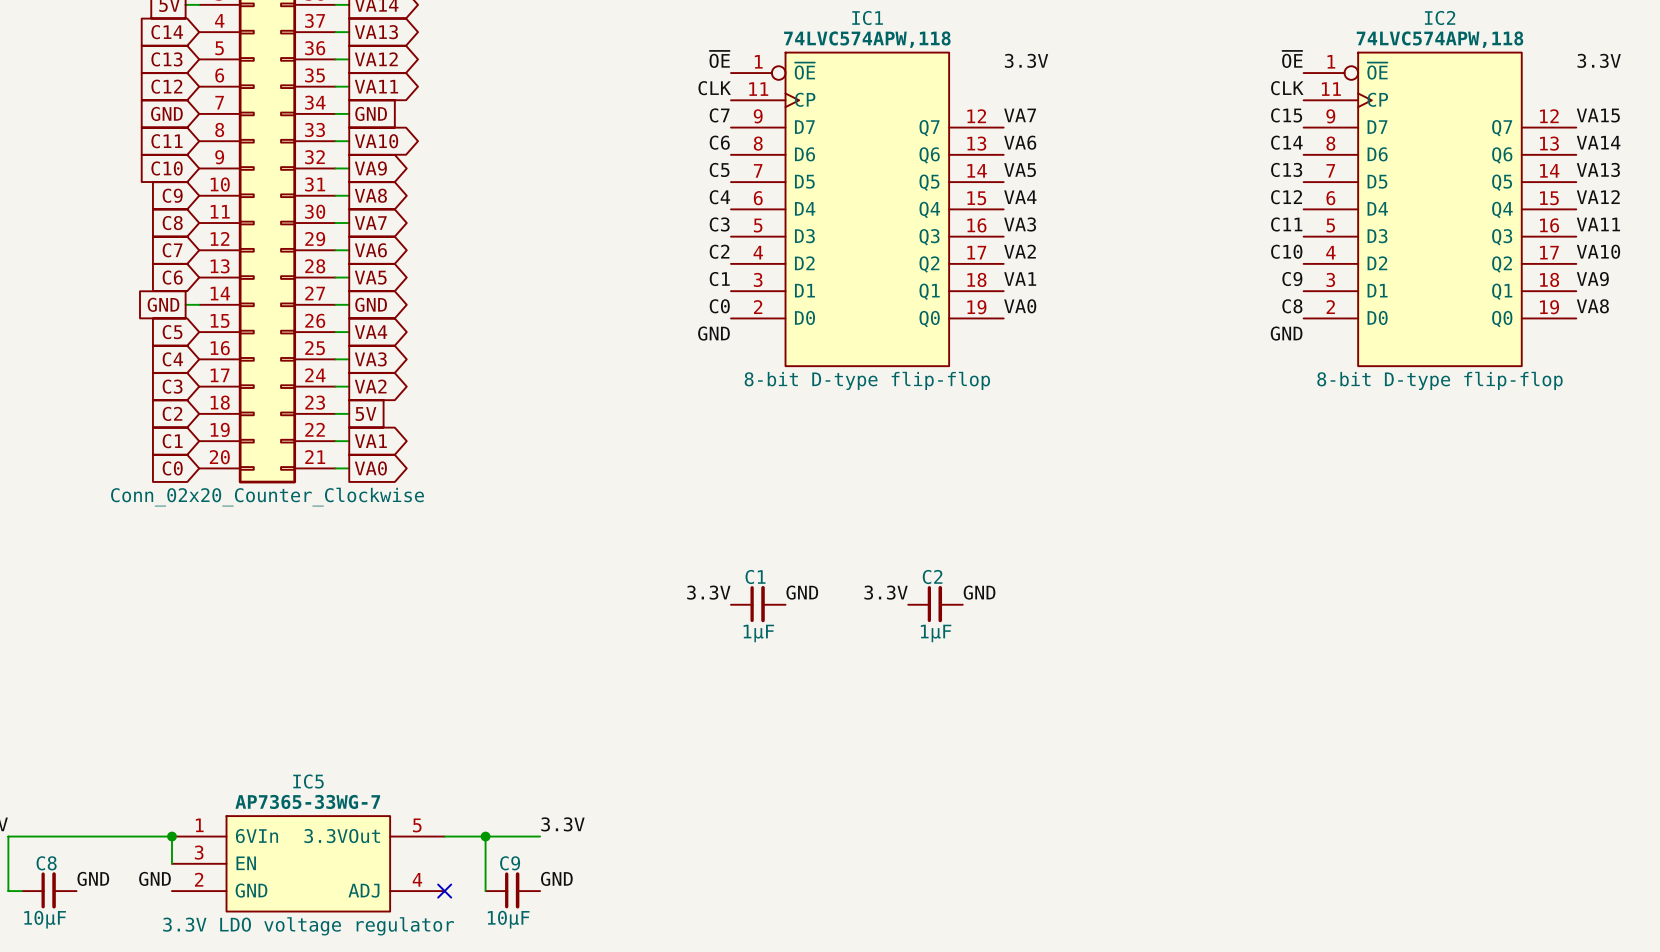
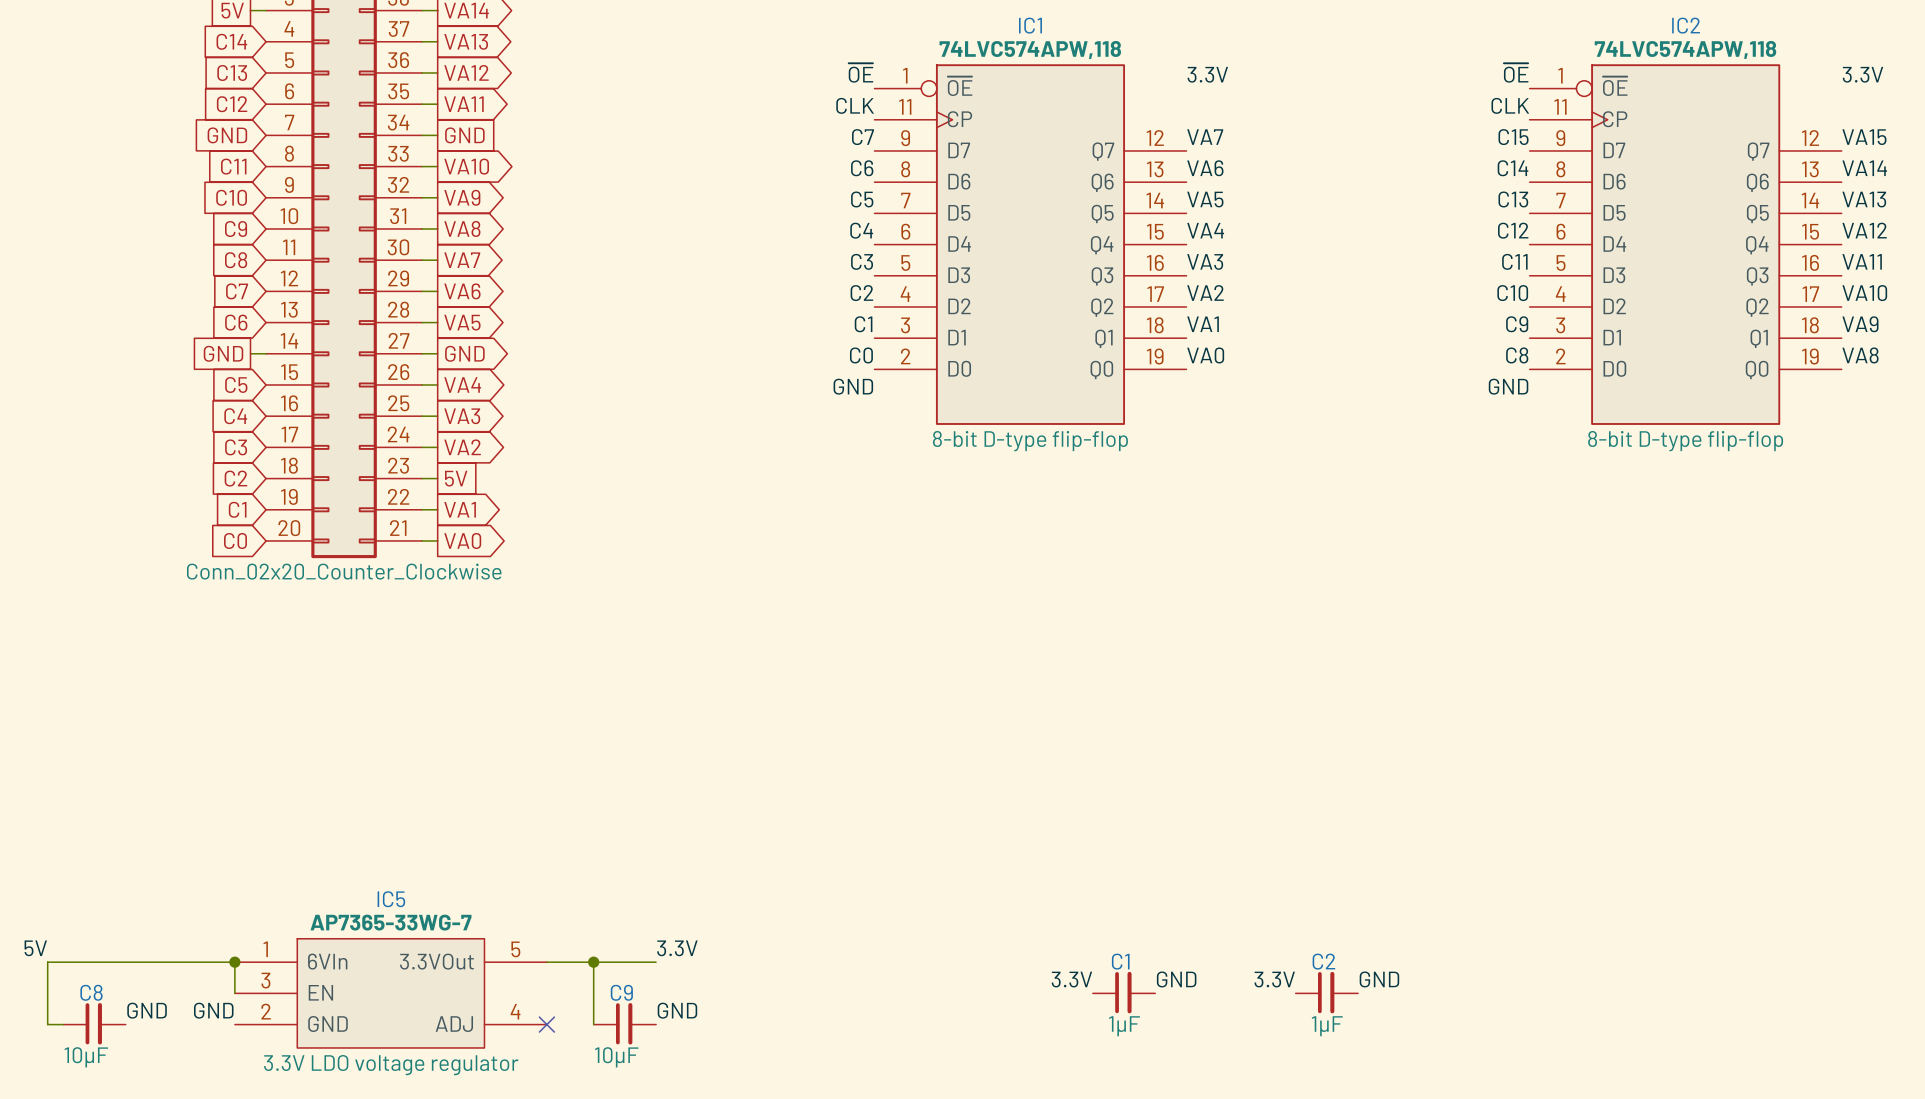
label: 3.3V (708, 592) -> none
label: GND (802, 592) -> none
label: 3.3V (886, 592) -> none
label: GND (979, 592) -> none
C1 position: (758, 604) -> (1124, 992)
C2 position: (935, 604) -> (1326, 992)
label: none -> 3.3V (1071, 979)
label: none -> GND (1176, 979)
label: none -> 3.3V (1274, 979)
label: none -> GND (1379, 979)

